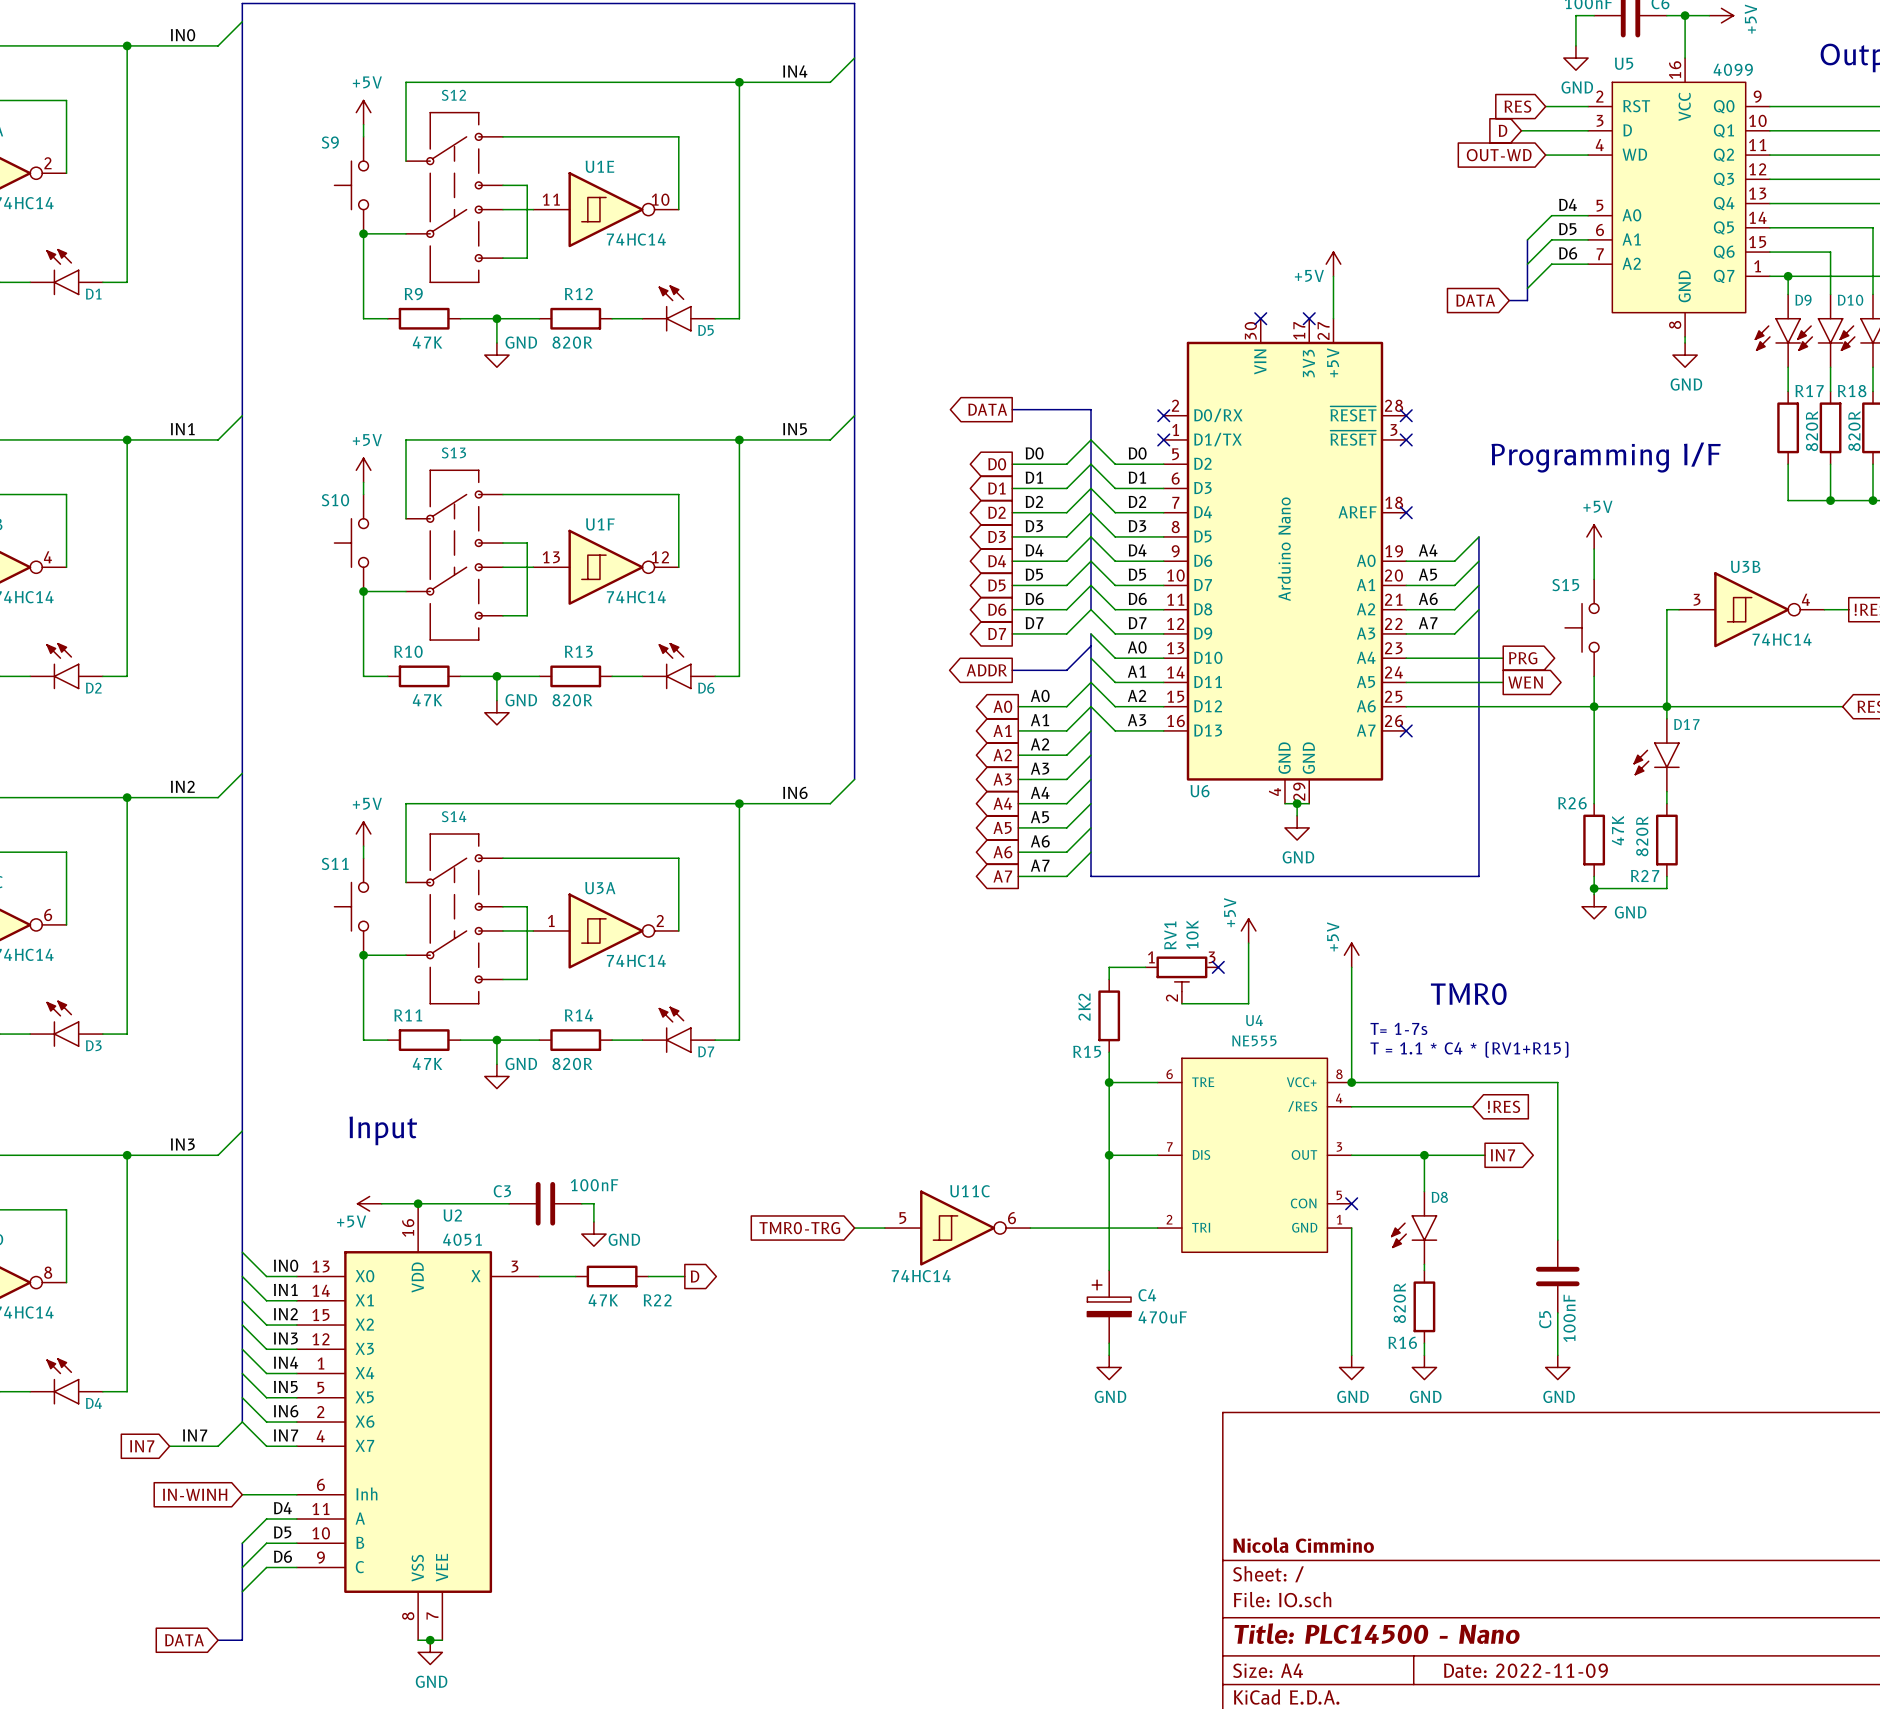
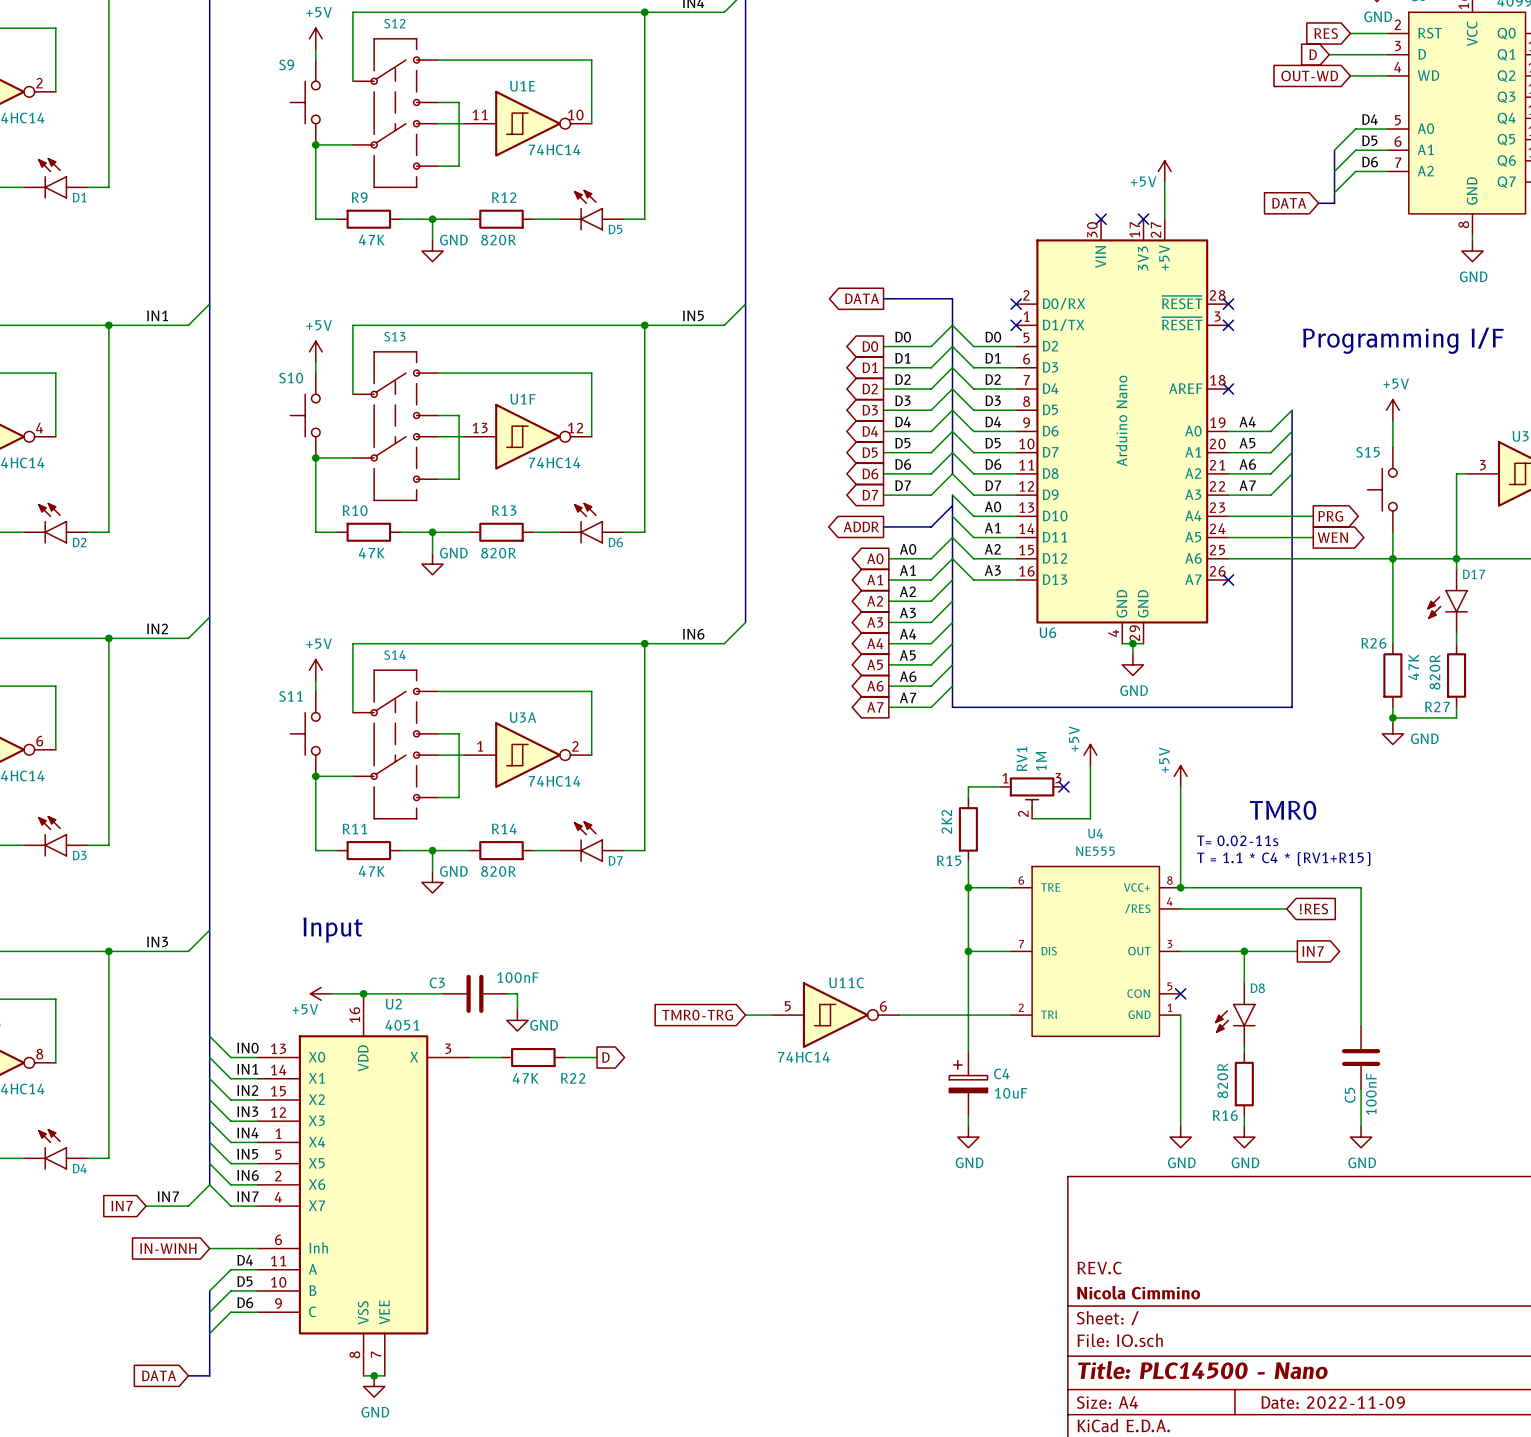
RV1 value: 10K (1192, 934) -> 1M (1041, 761)
text: T= 1-7s (1398, 1028) -> T= 0.02-11s (1237, 840)
C4 value: 470uF (1162, 1317) -> 10uF (1011, 1093)
title block: none -> REV.C (1099, 1268)

